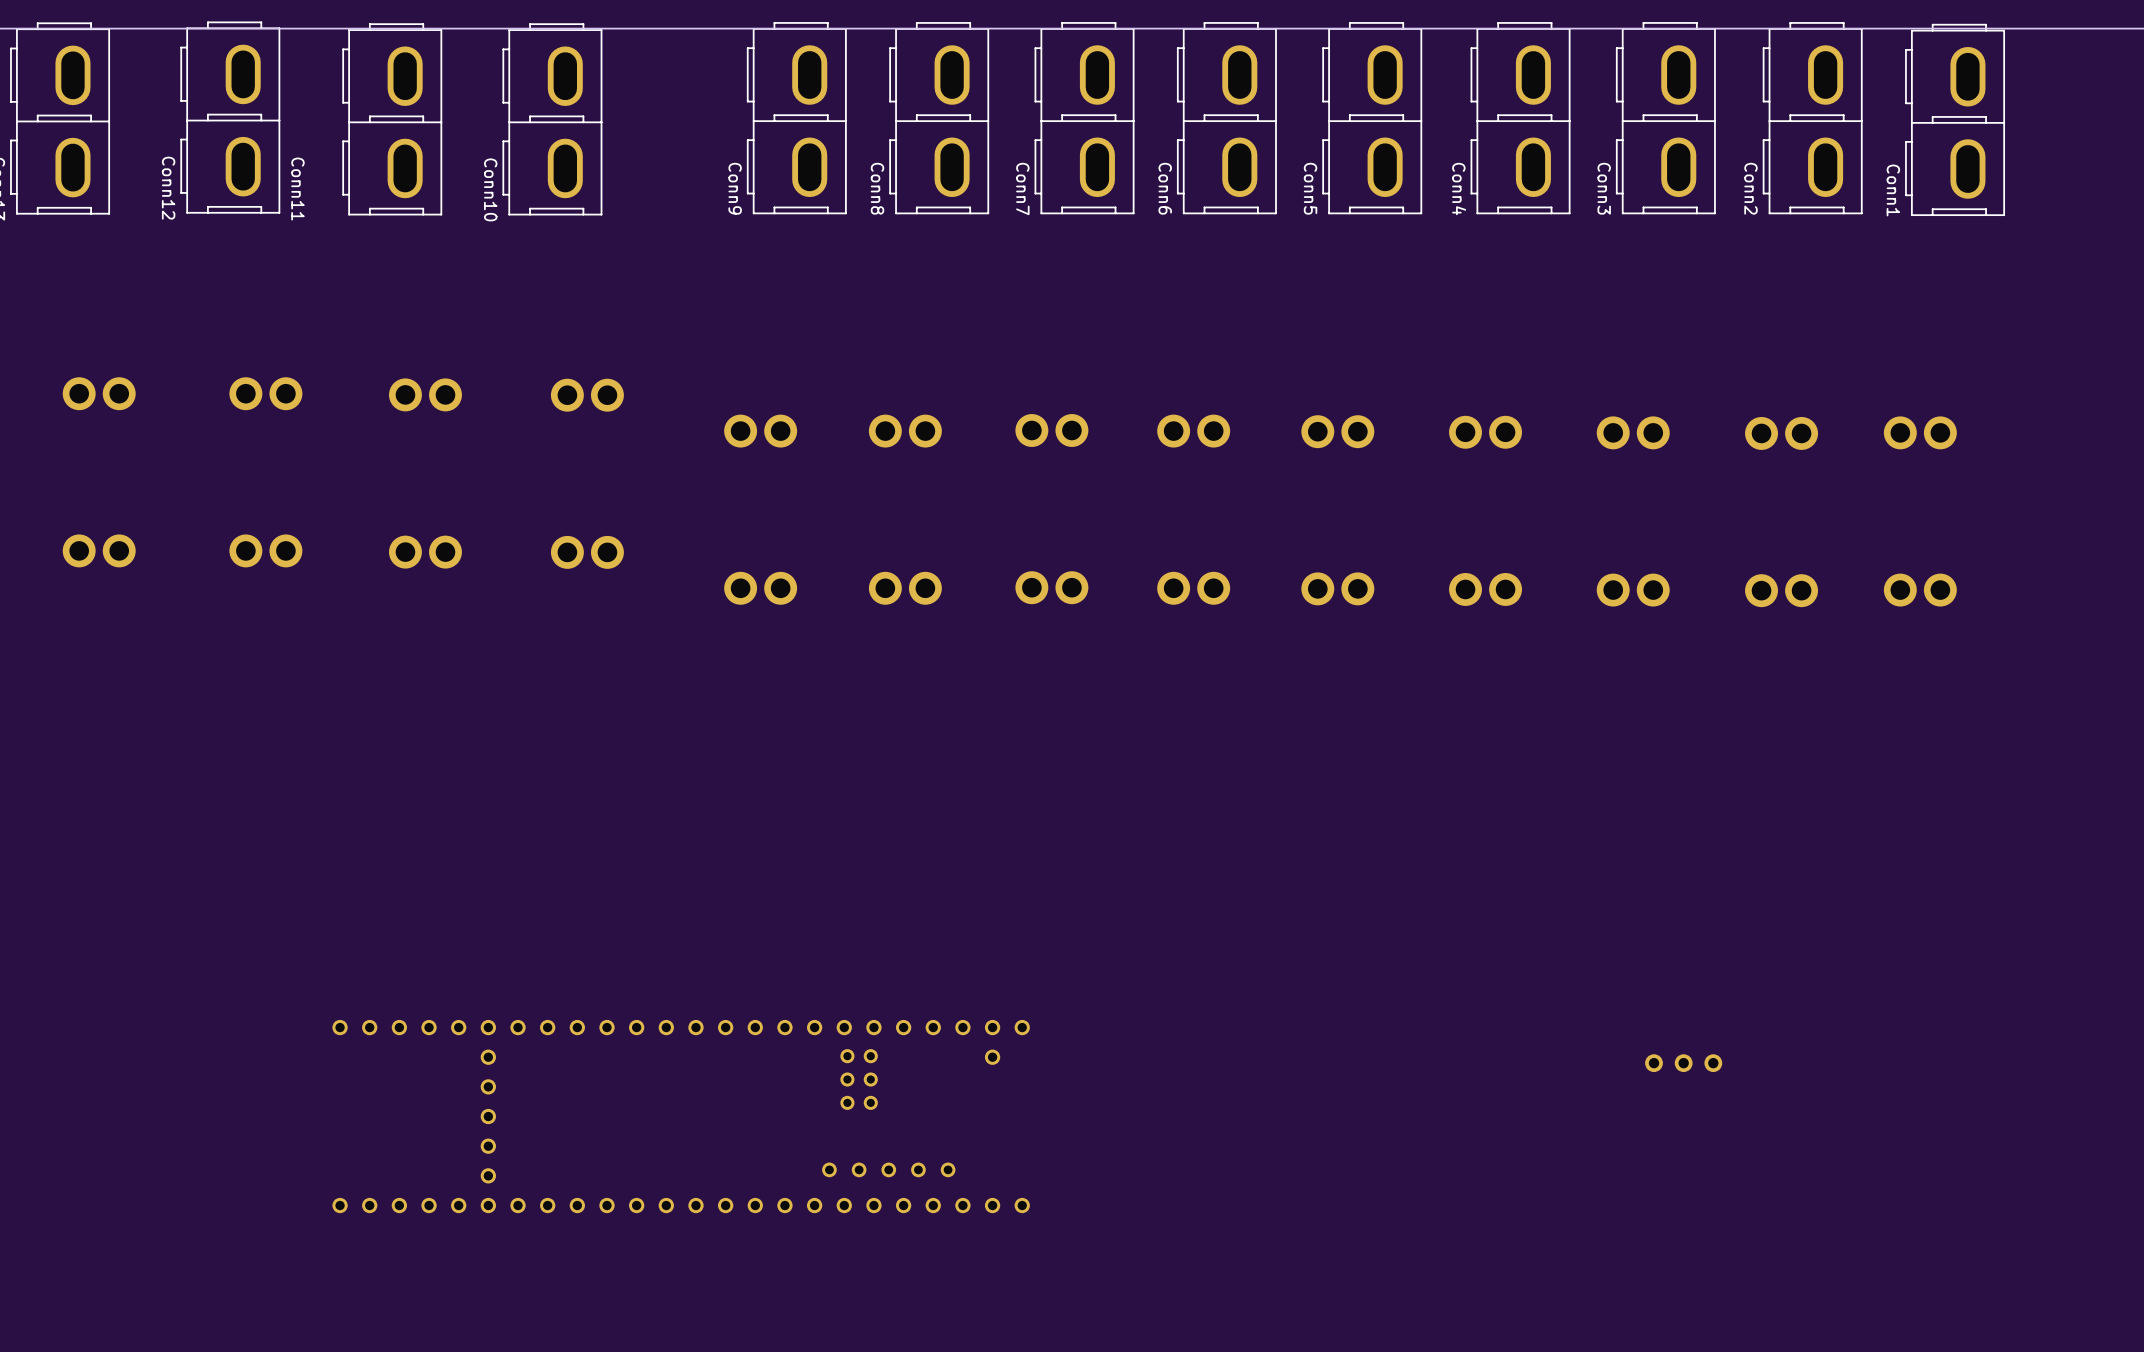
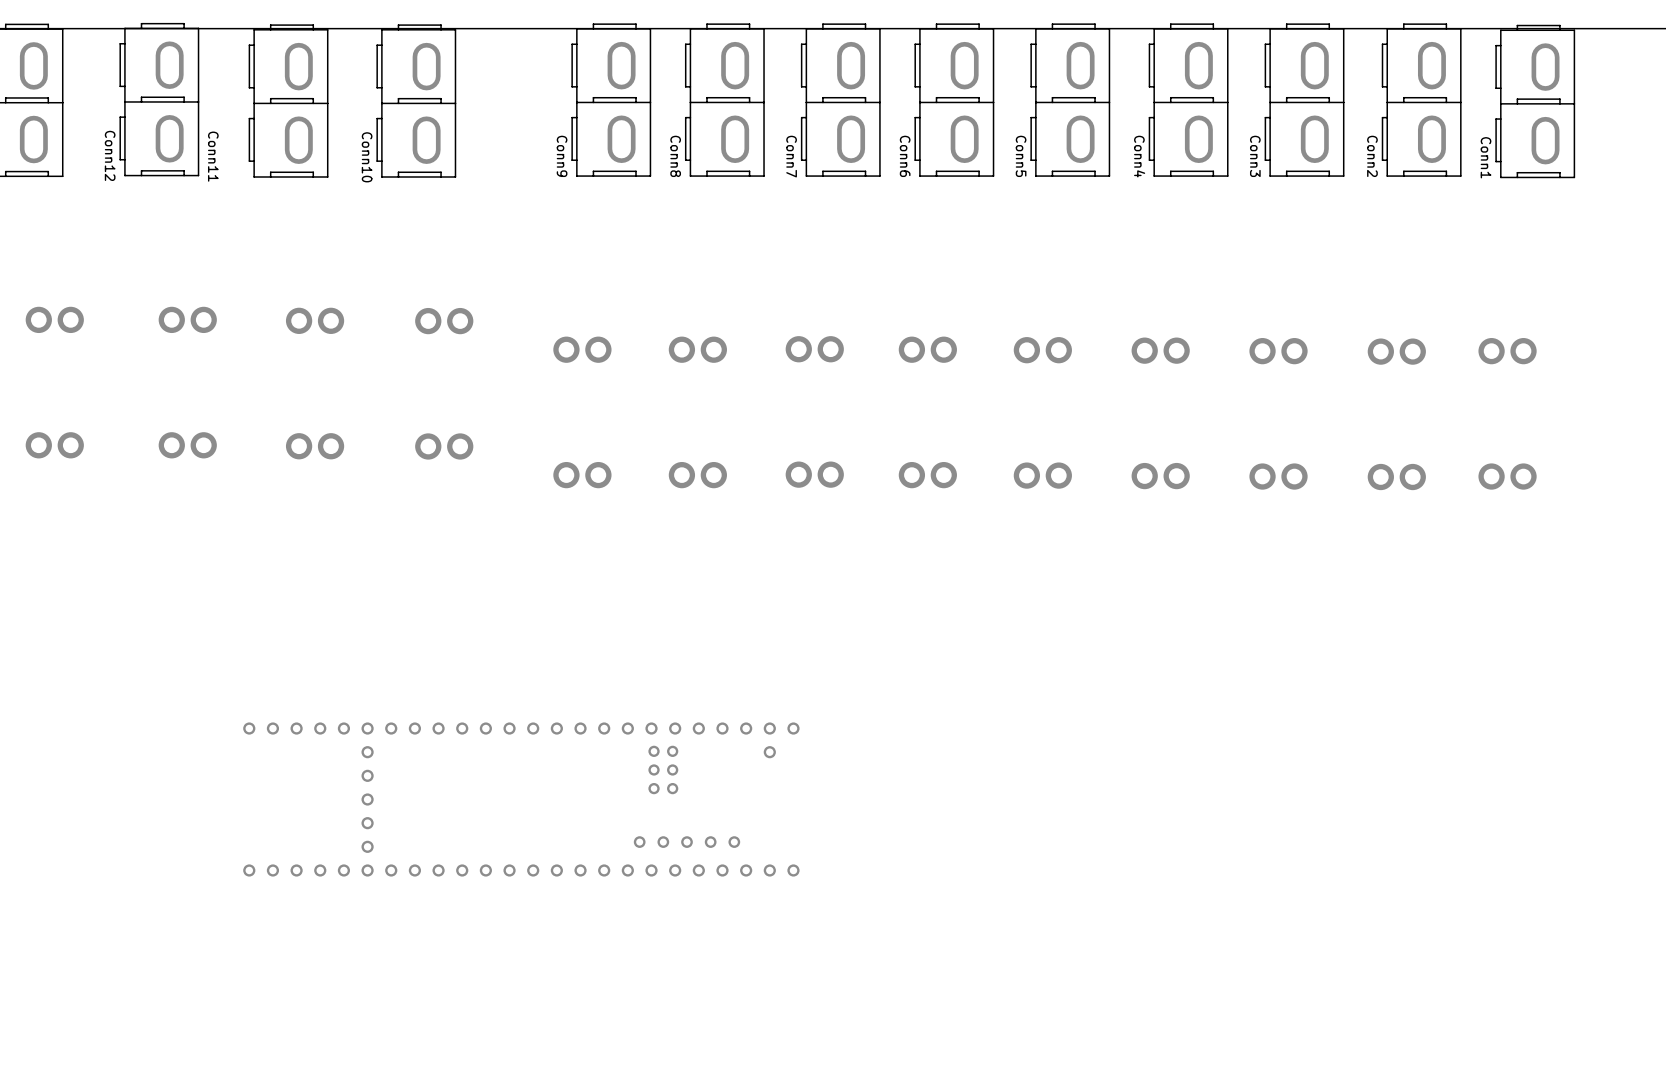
part: (1683, 1063) -> none
part position: (681, 1116) -> (521, 799)

